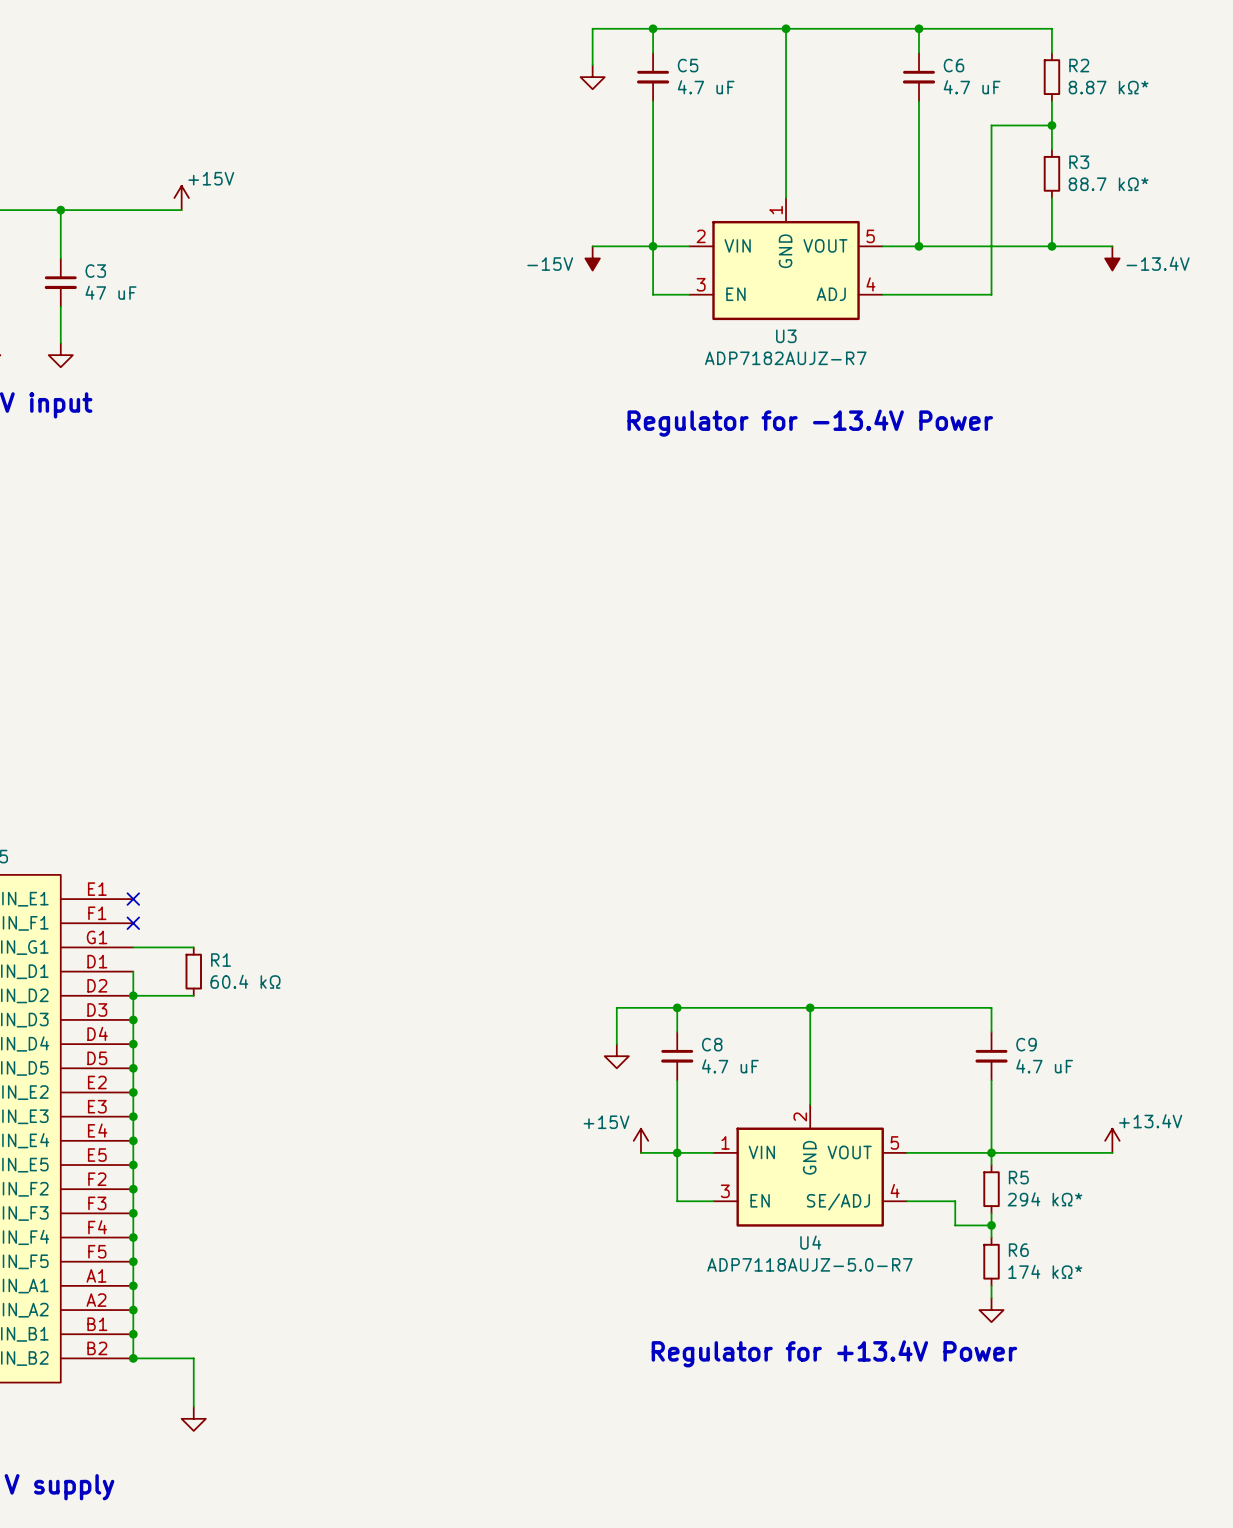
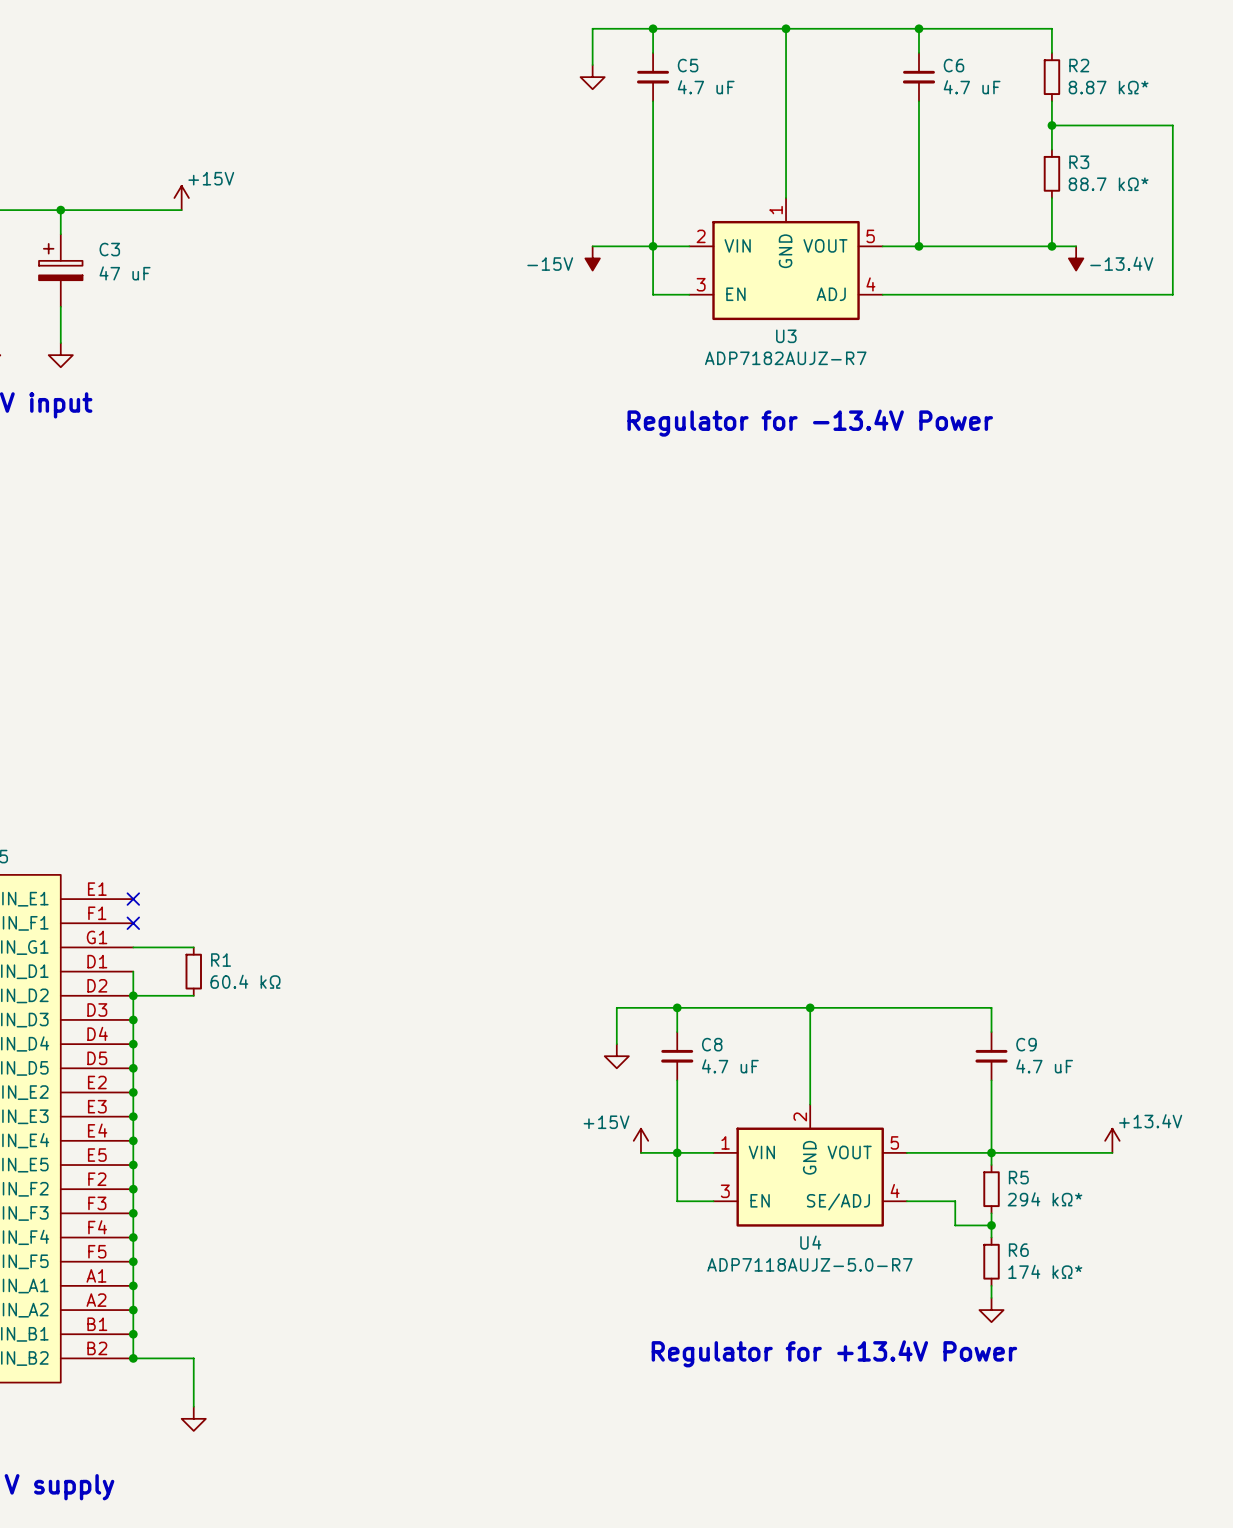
wire: (1051, 125) (991, 125) (991, 294) -> (1051, 125) (1172, 125) (1172, 294) (991, 294)
wire: (1076, 246) (1112, 246) -> none
C3 symbol: [44, 258, 77, 307] -> [39, 234, 83, 307]
power symbol position: -13.4V (1112, 258) -> -13.4V (1076, 258)

